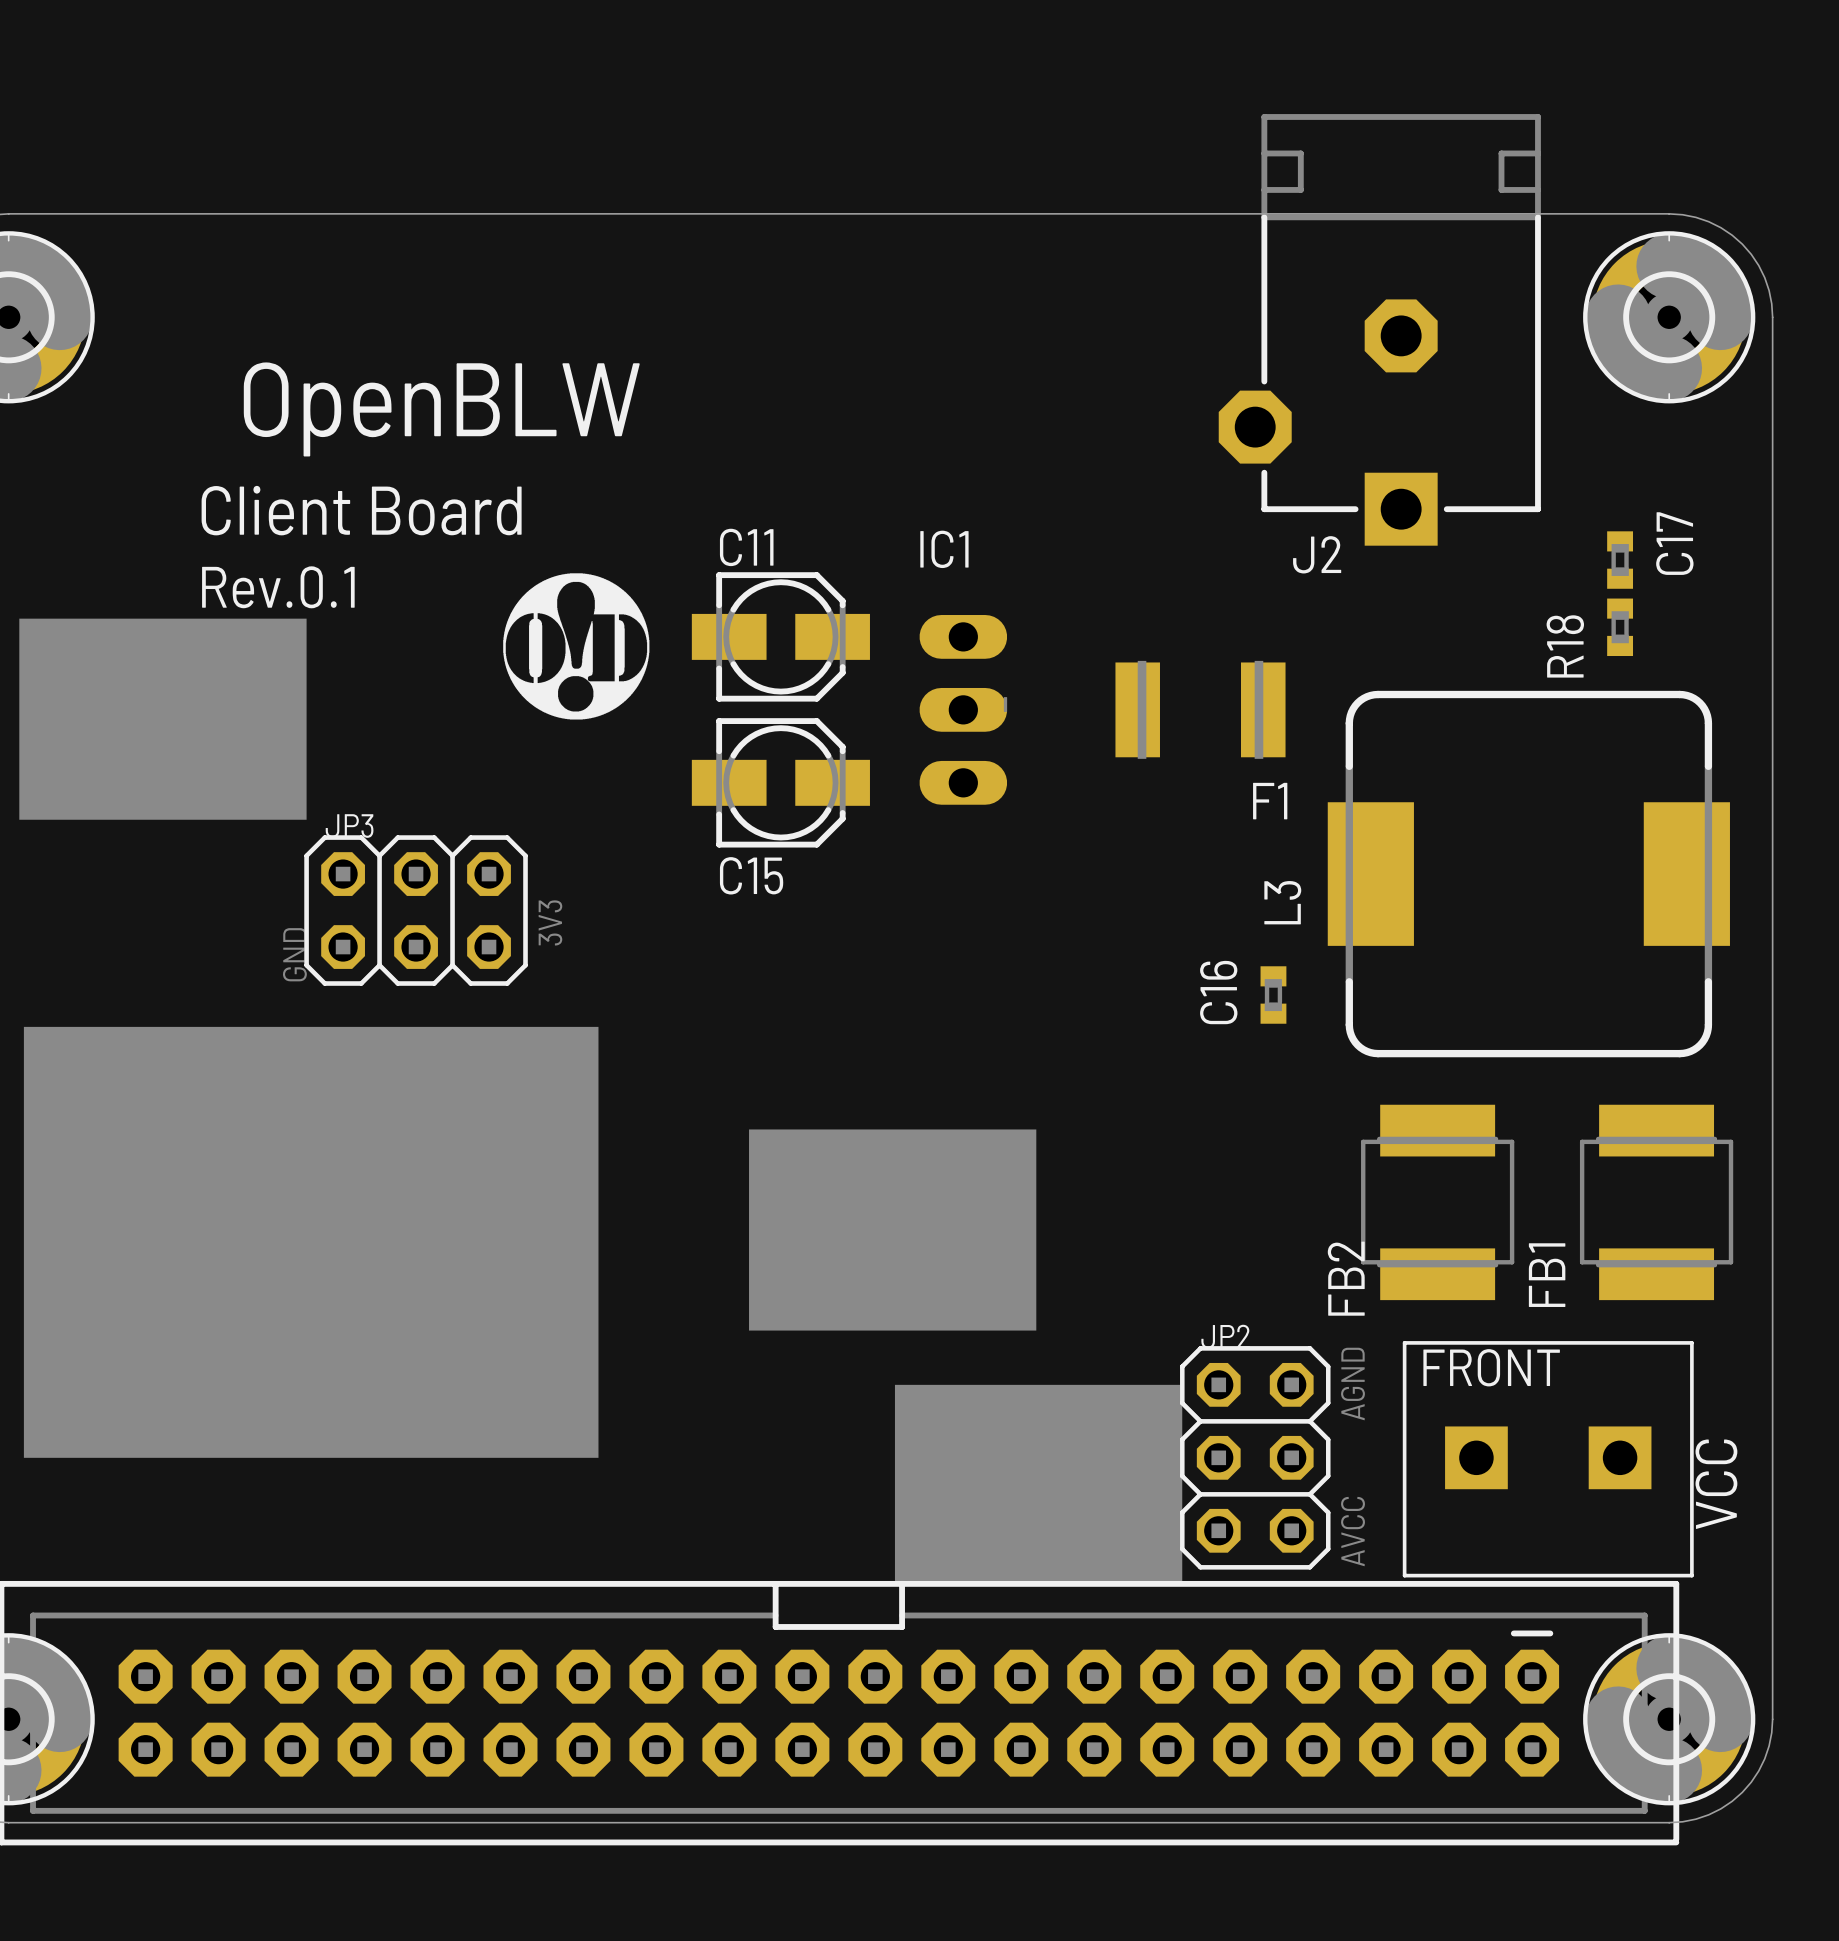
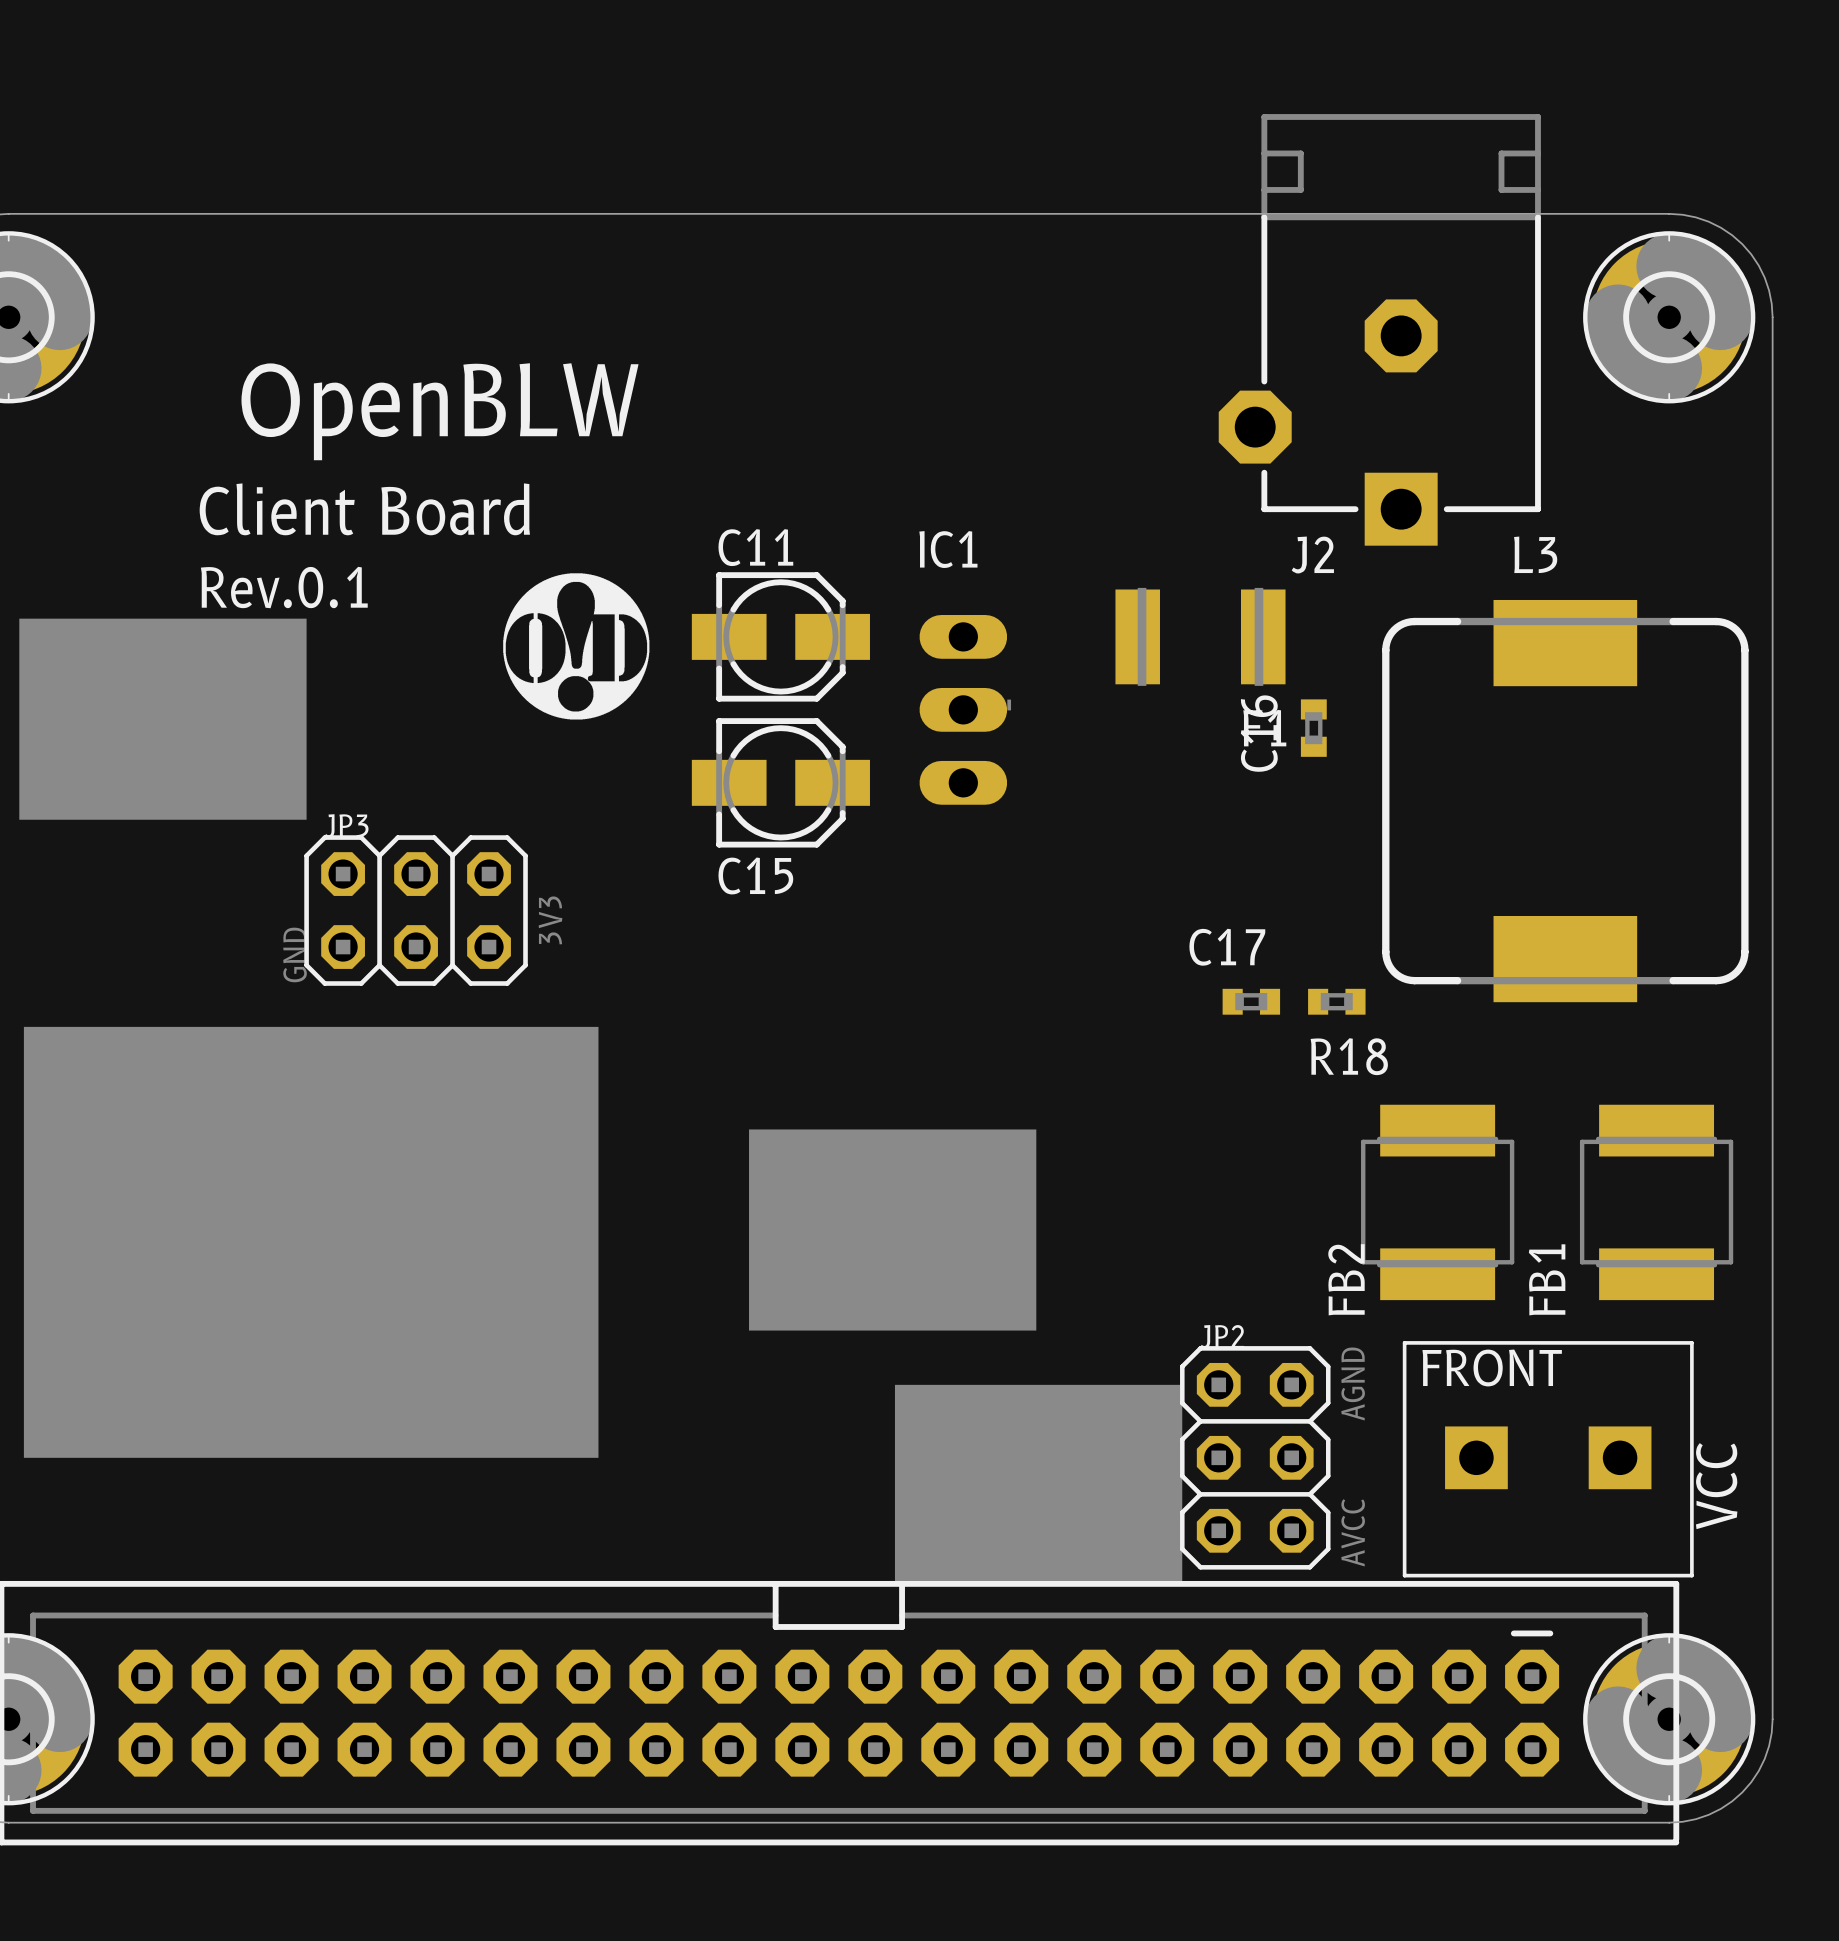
C17 name position: C17 (1674, 543) -> C17 (1227, 947)
C17 rotation: 0° (1620, 560) -> 90° clockwise (1251, 1001)
C17 position: (1620, 560) -> (1251, 1001)
R18 rotation: 0° (1620, 627) -> 90° clockwise (1336, 1001)
R18 position: (1620, 627) -> (1336, 1001)
R18 name position: R18 (1565, 646) -> R18 (1349, 1056)
F1 position: (1200, 709) -> (1200, 636)
L3 rotation: 0° (1528, 874) -> 90° clockwise (1565, 801)
C16 position: (1273, 995) -> (1313, 728)

